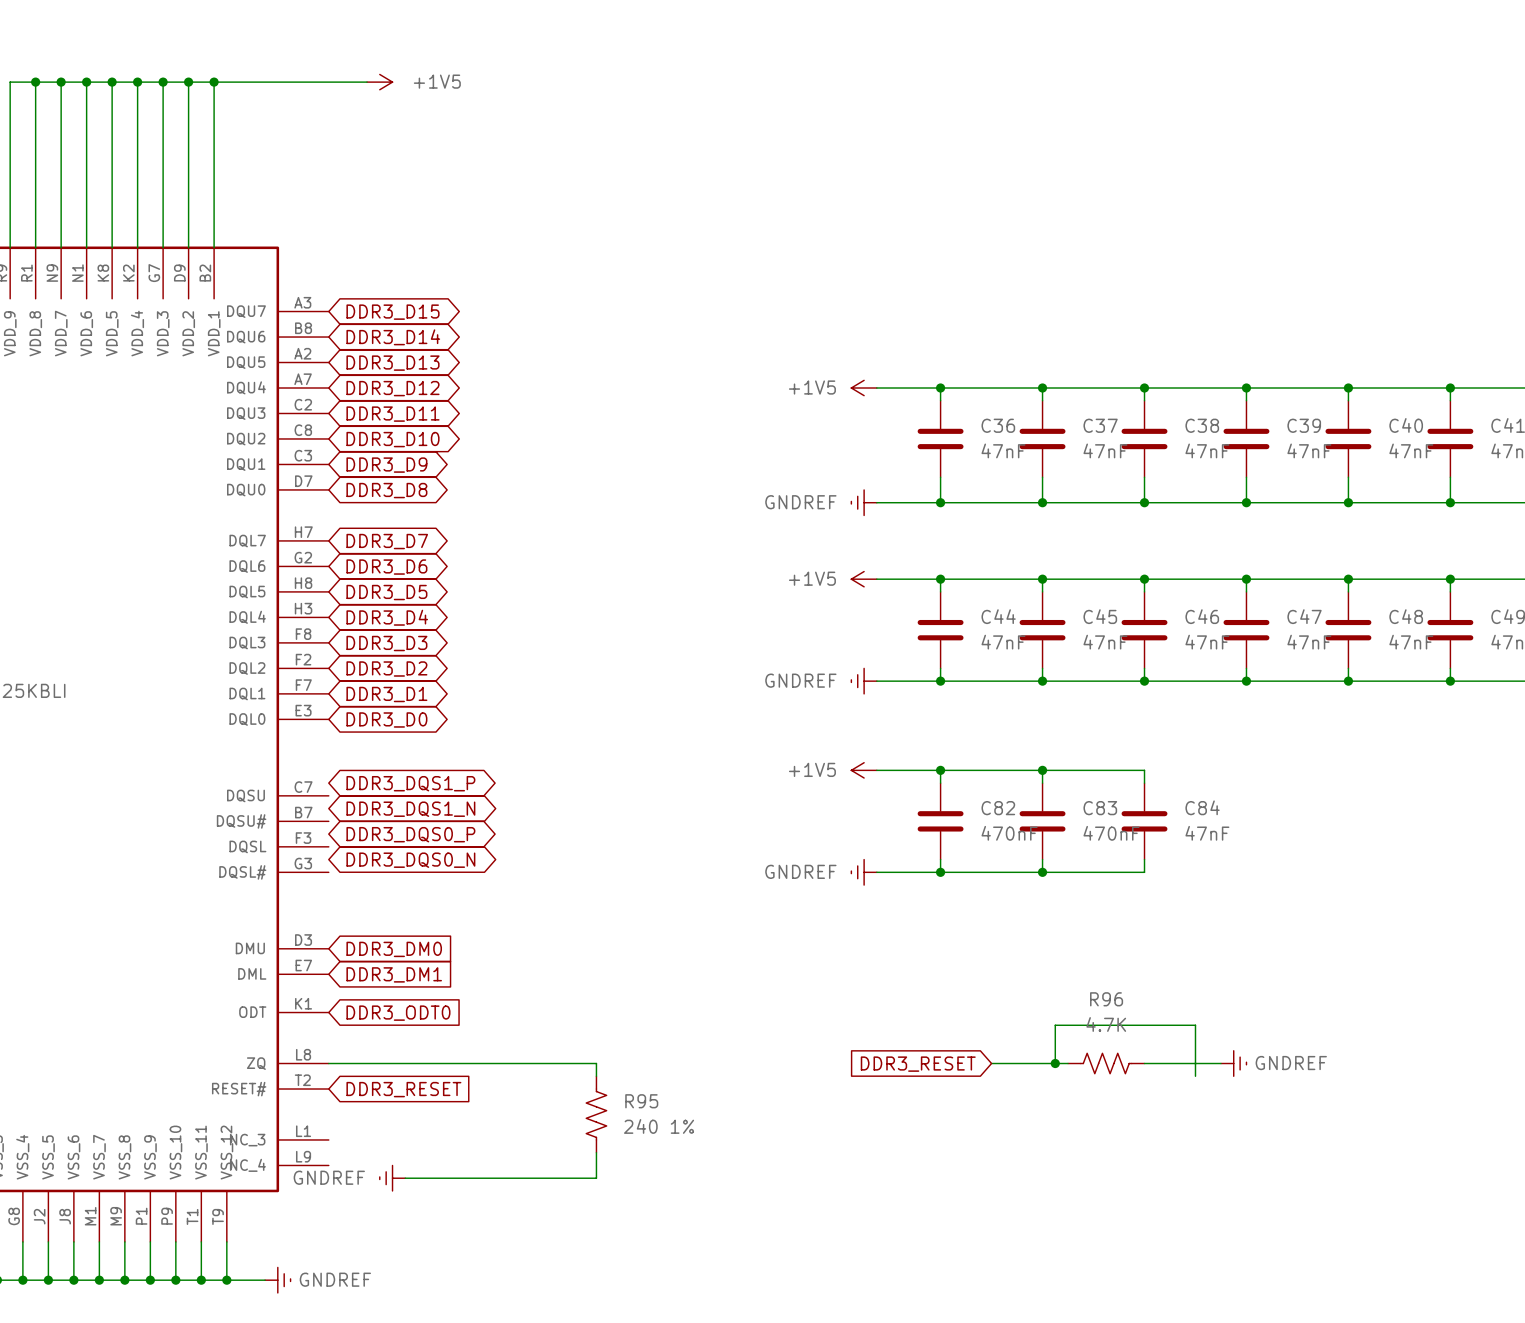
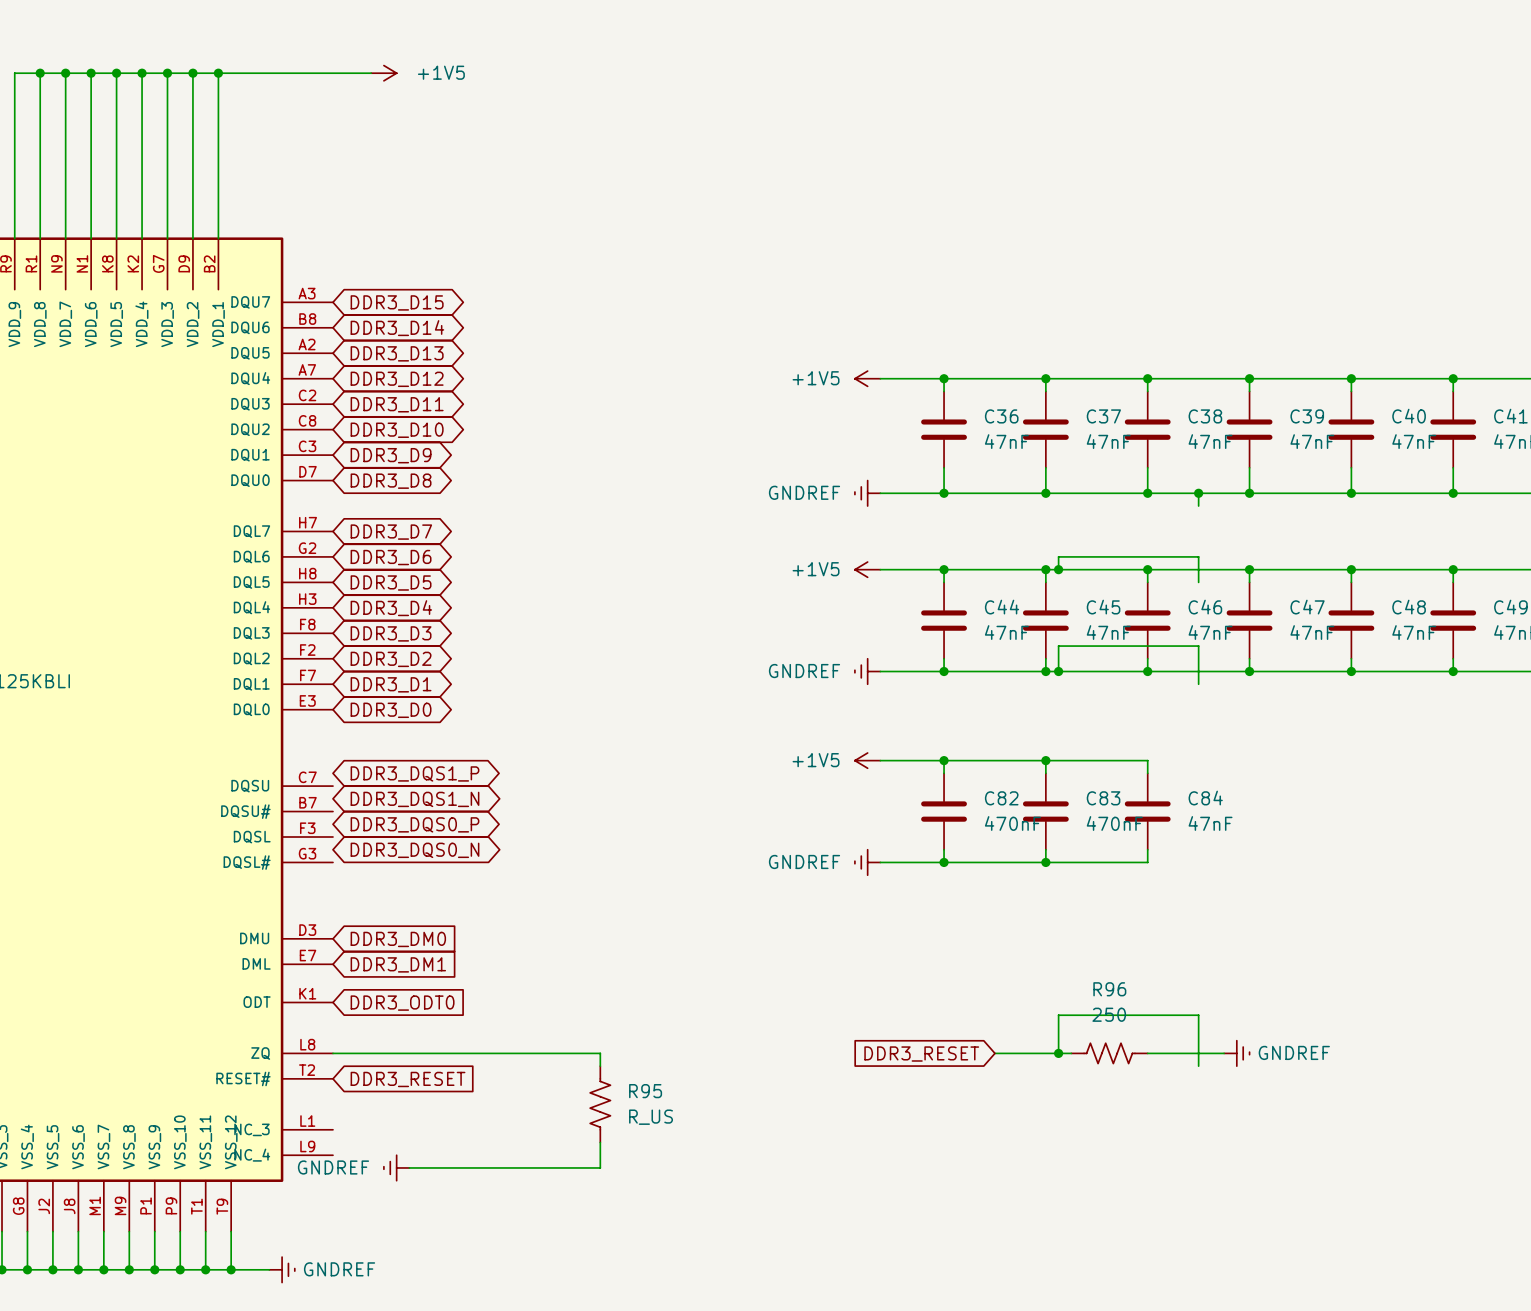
wire: none -> (1198, 493) (1198, 506)
junction: none -> (1198, 493)
wire: none -> (1058, 569) (1058, 556) (1198, 556) (1198, 582)
junction: none -> (1058, 569)
wire: none -> (1058, 671) (1058, 646) (1198, 646) (1198, 684)
junction: none -> (1058, 671)
R96 value: 4.7K (1106, 1024) -> 250 (1109, 1014)
R95 value: 240 1% (659, 1126) -> R_US (651, 1117)

